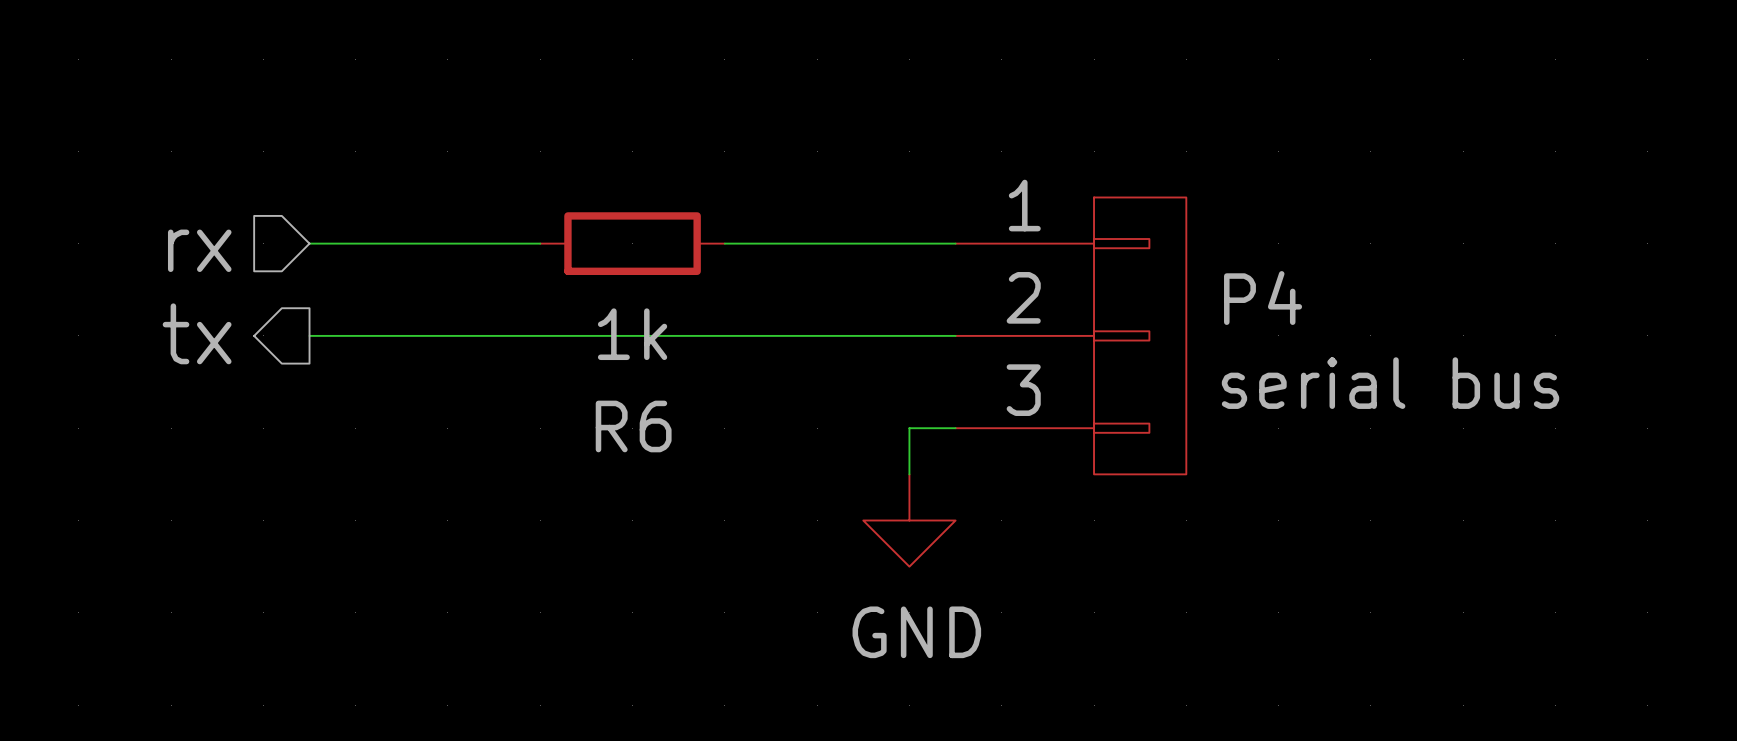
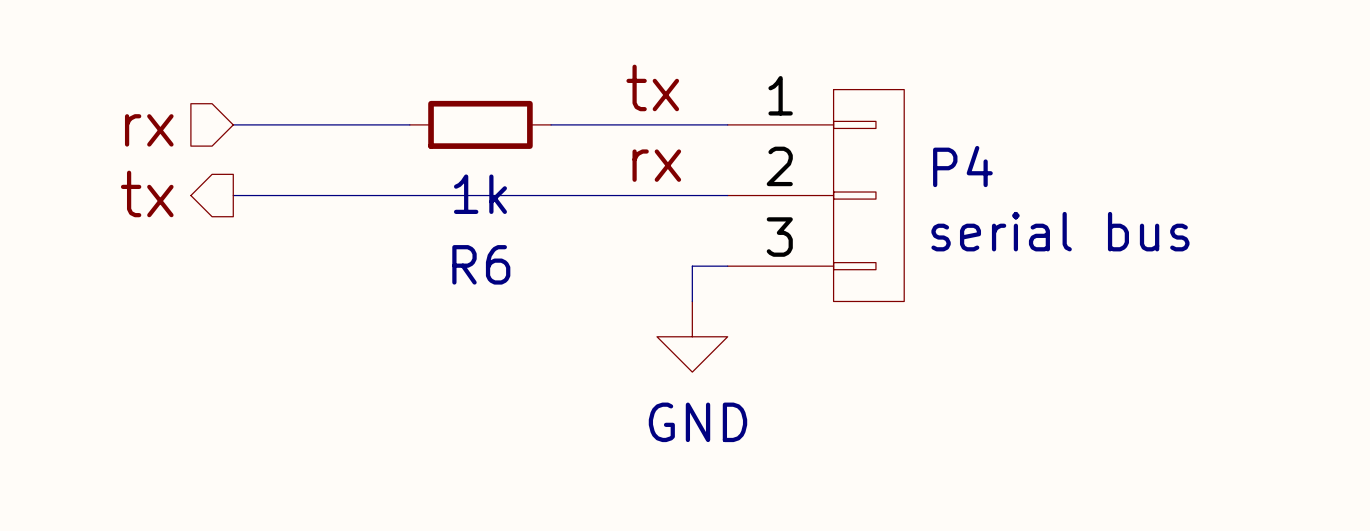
label: none -> tx (652, 87)
label: none -> rx (656, 165)

